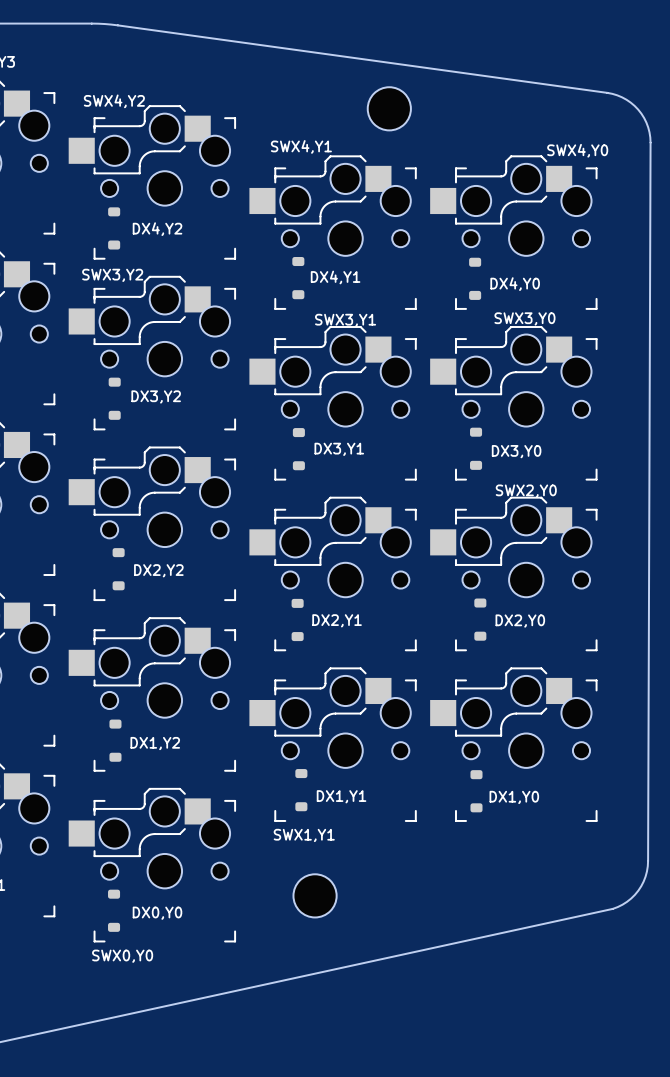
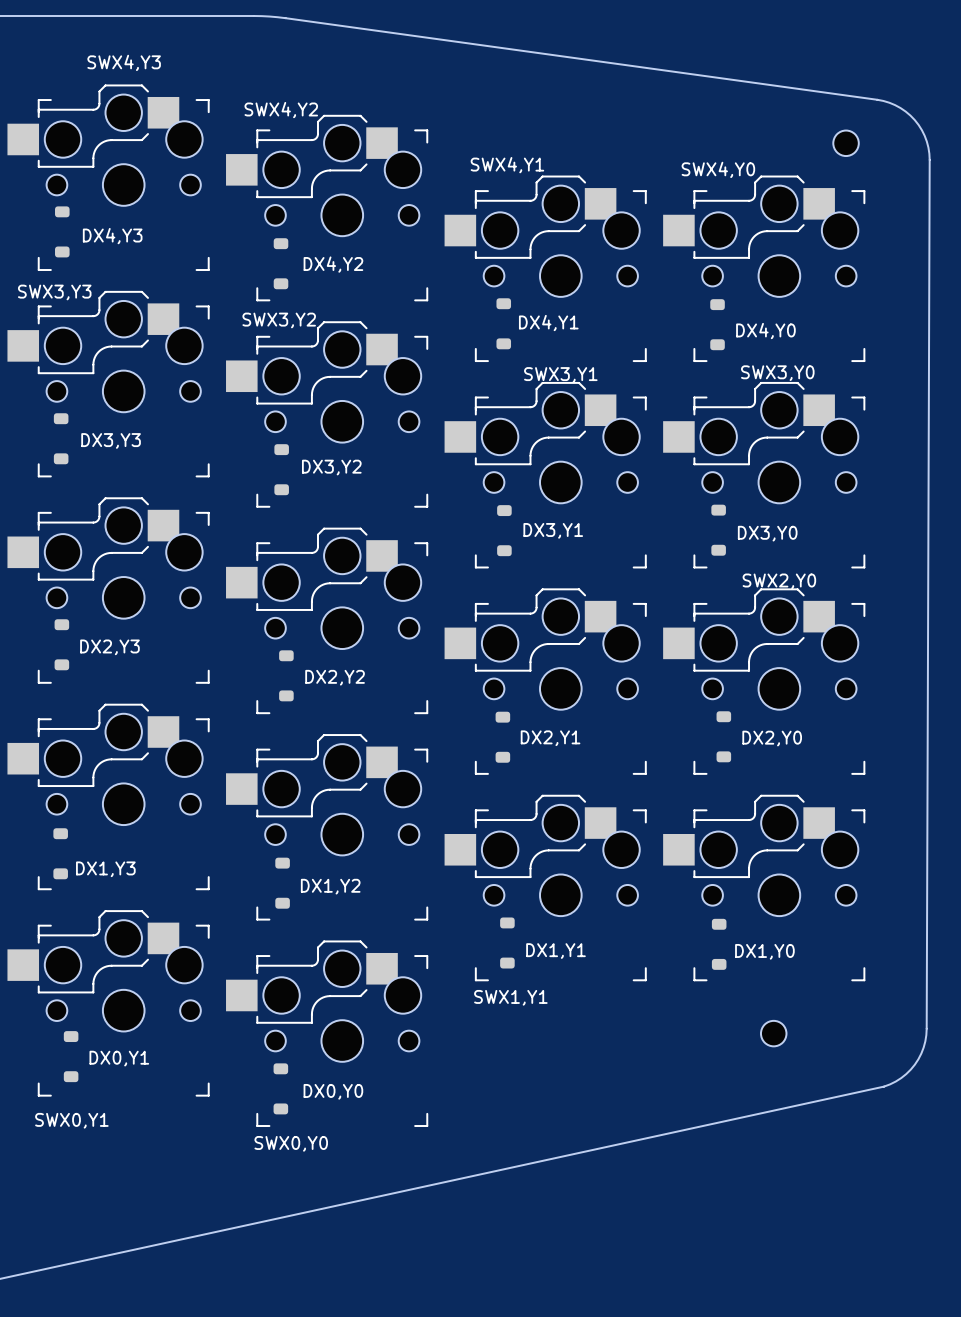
part: (389, 108) -> none
part: none -> (846, 143)
SWX4,Y0 name position: SWX4,Y0 (577, 150) -> SWX4,Y0 (718, 169)
part: none -> (773, 1033)
part: (315, 895) -> none

